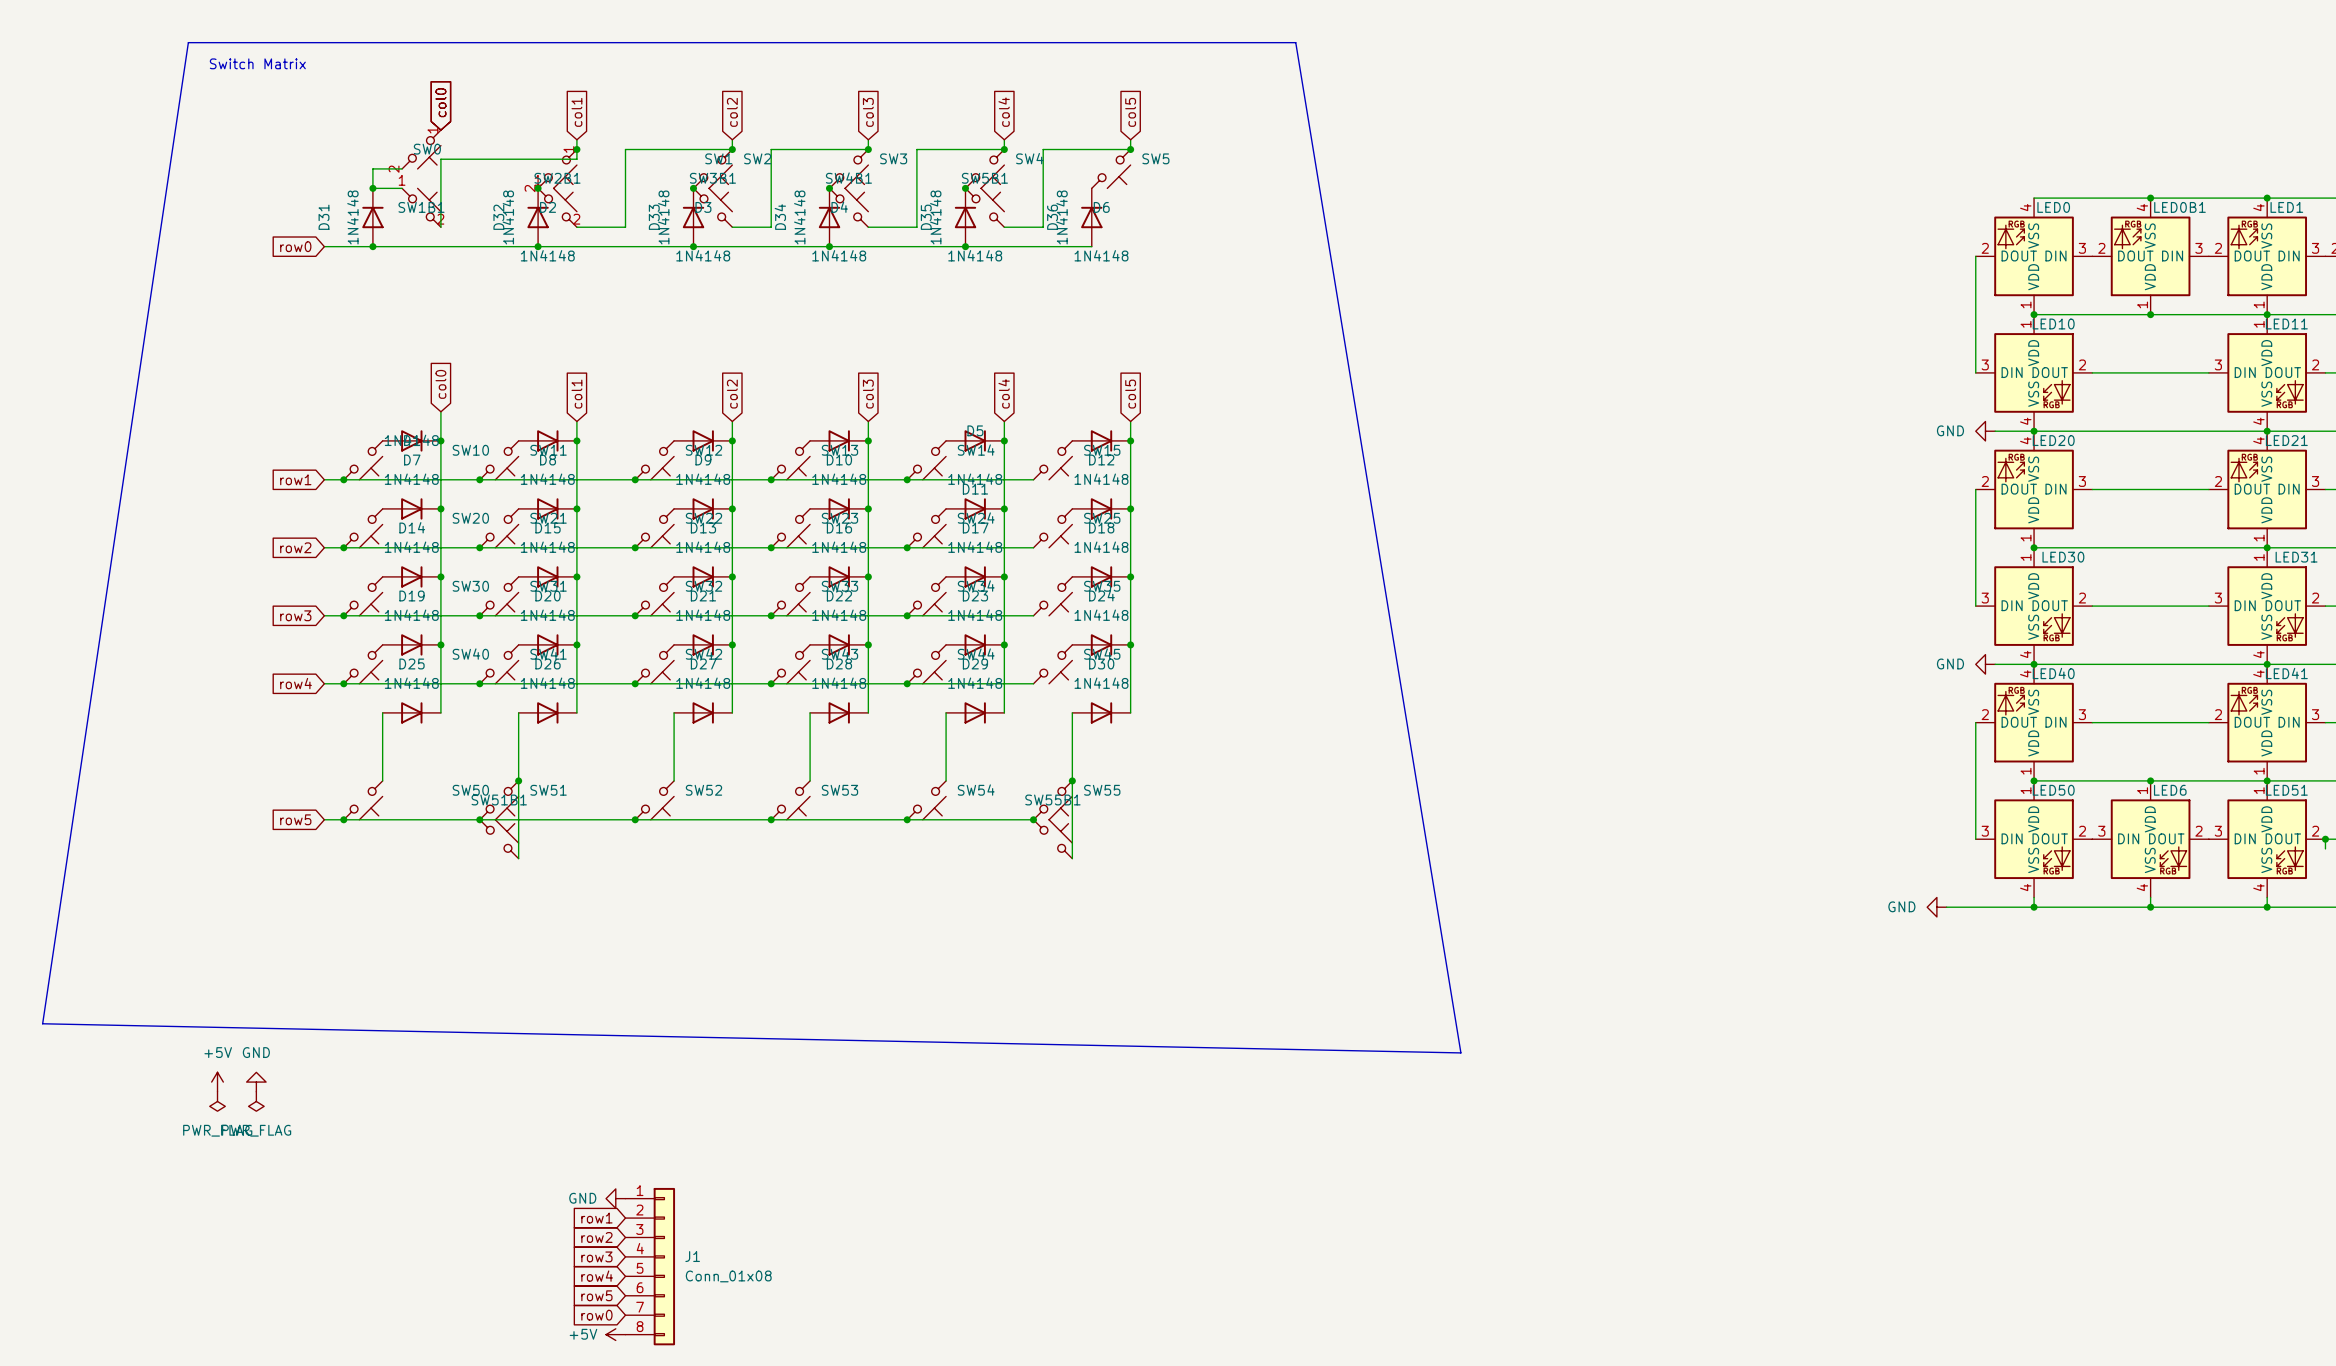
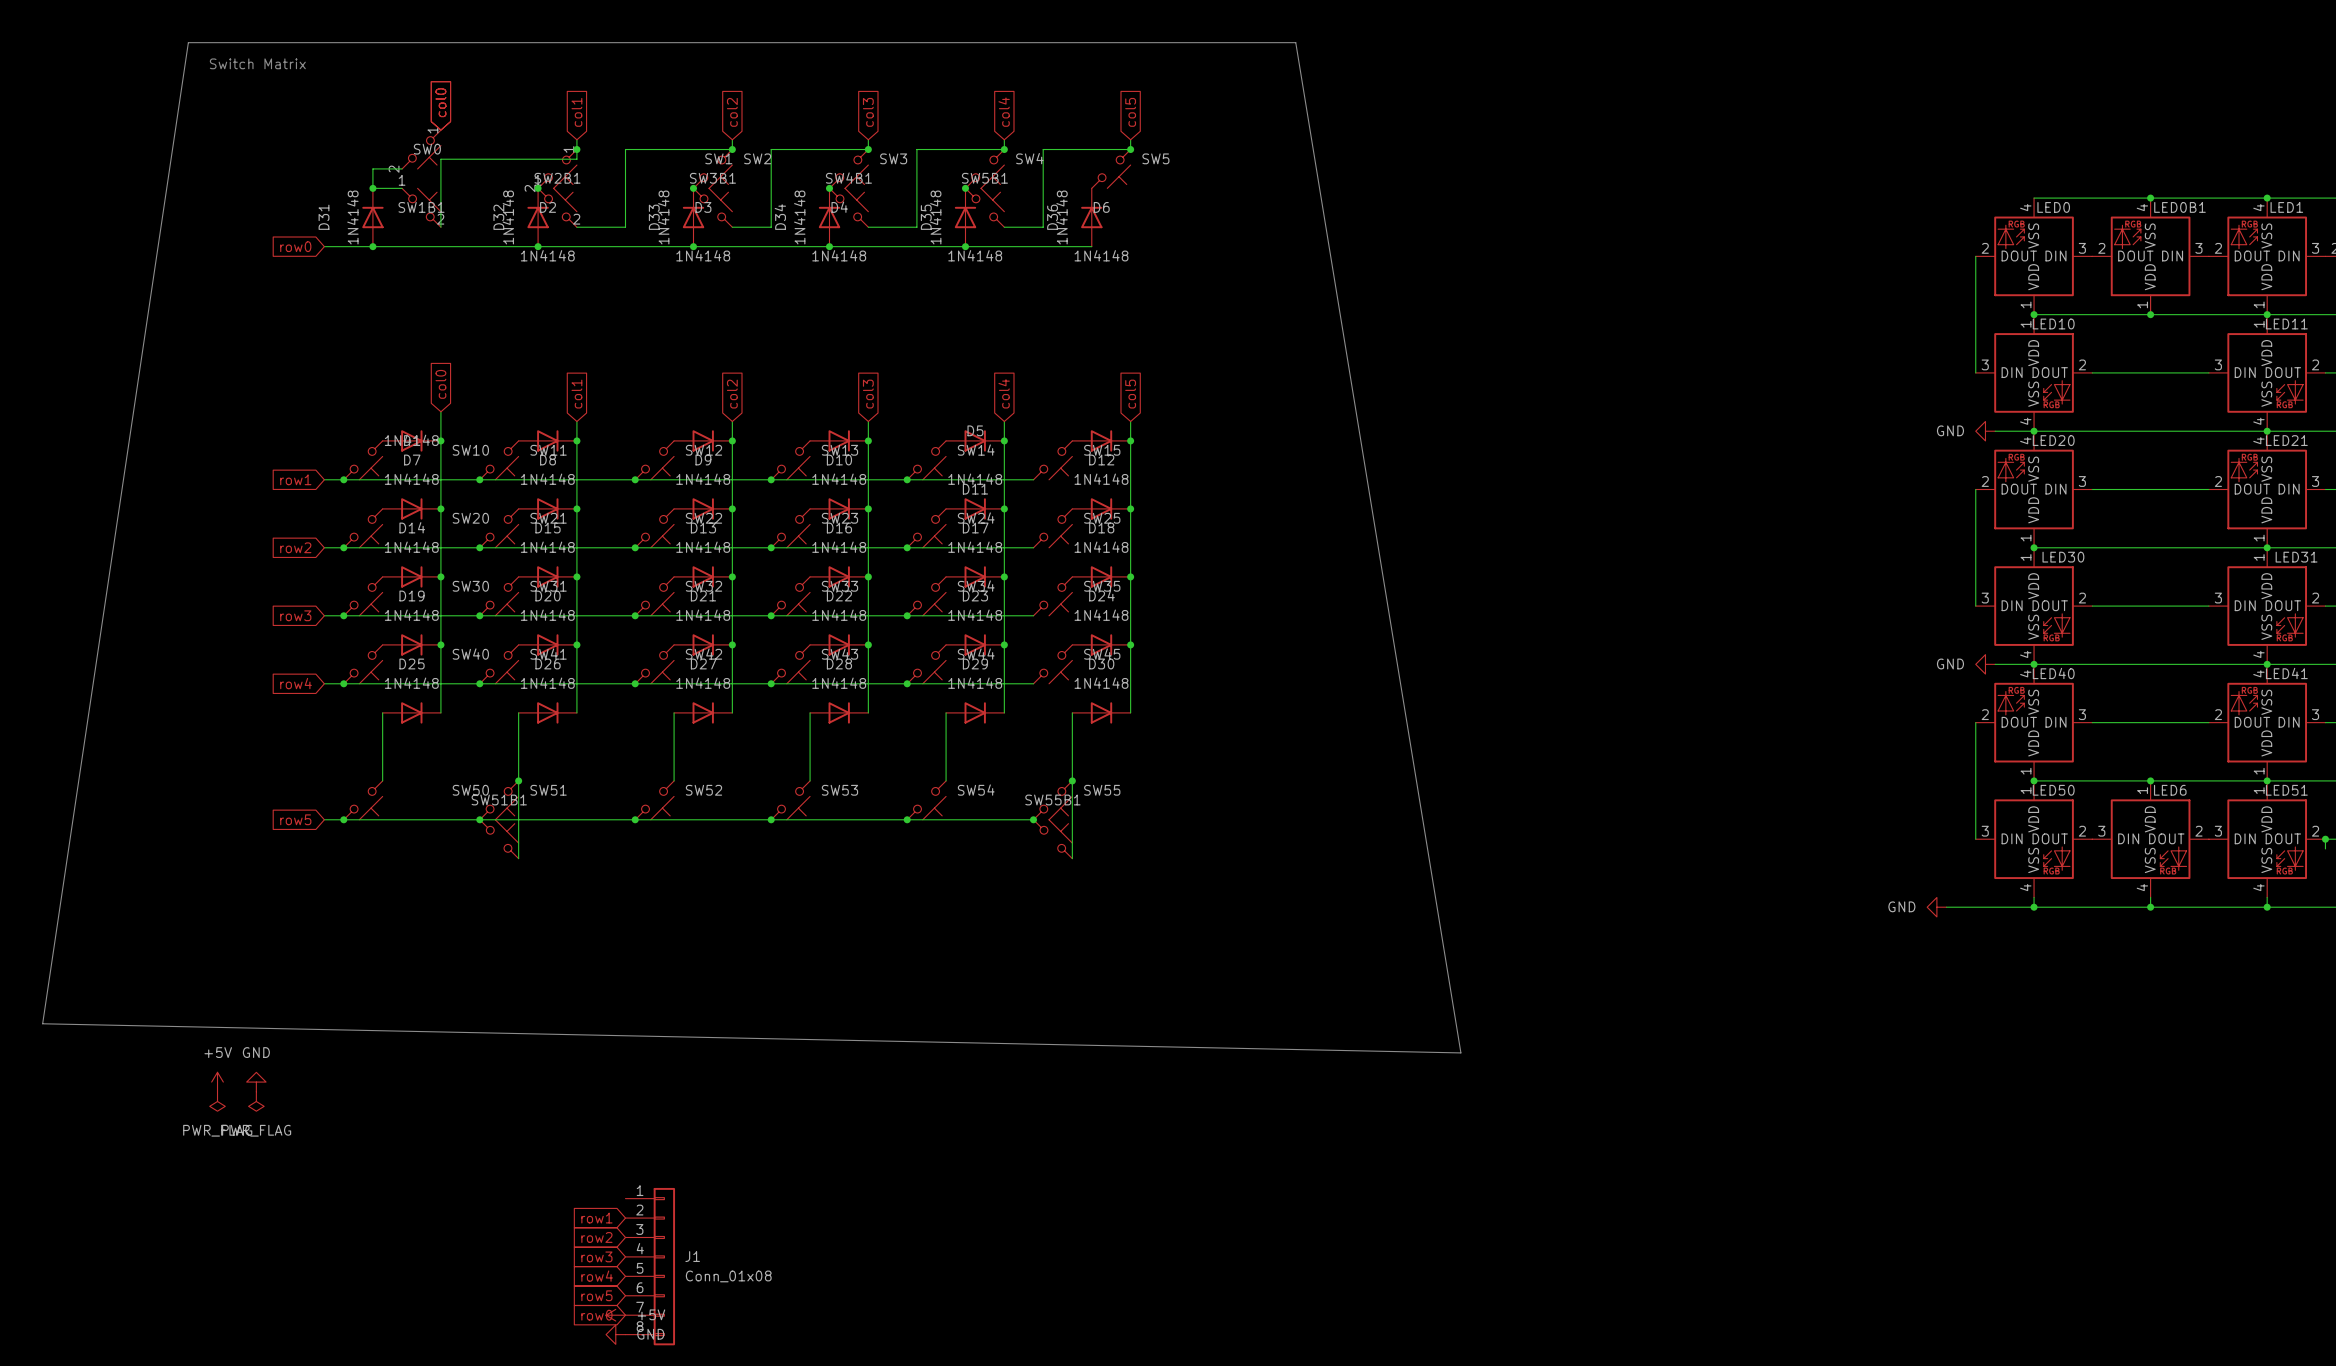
power symbol: GND (615, 1198) -> none
power symbol: none -> +5V (615, 1315)
power symbol: +5V (615, 1334) -> GND (615, 1334)

